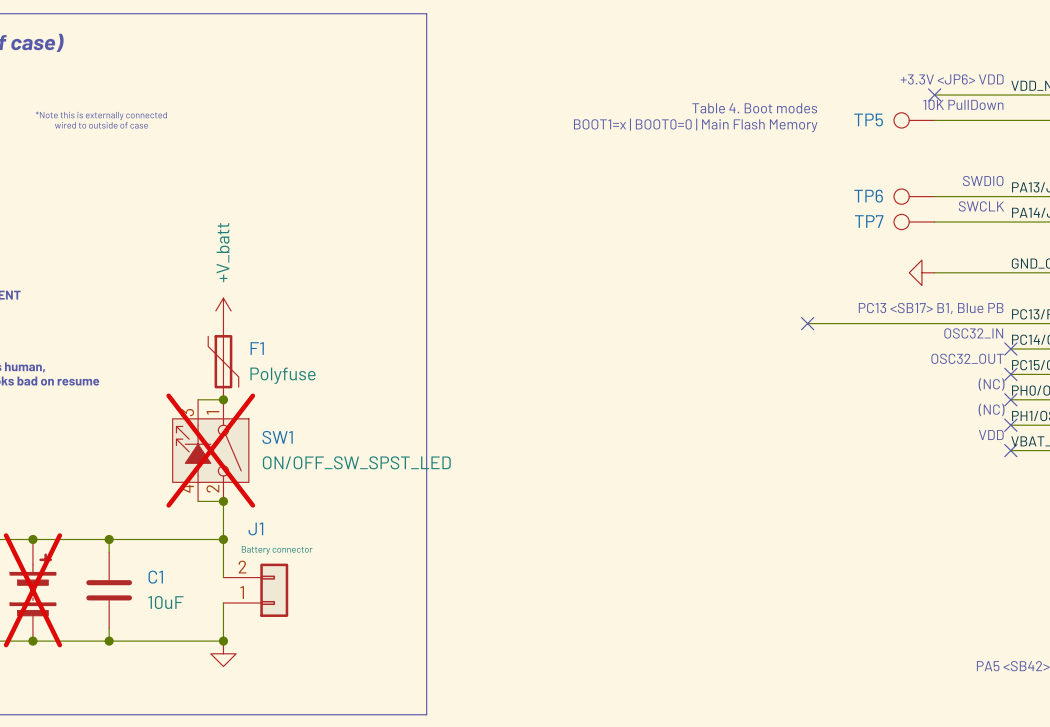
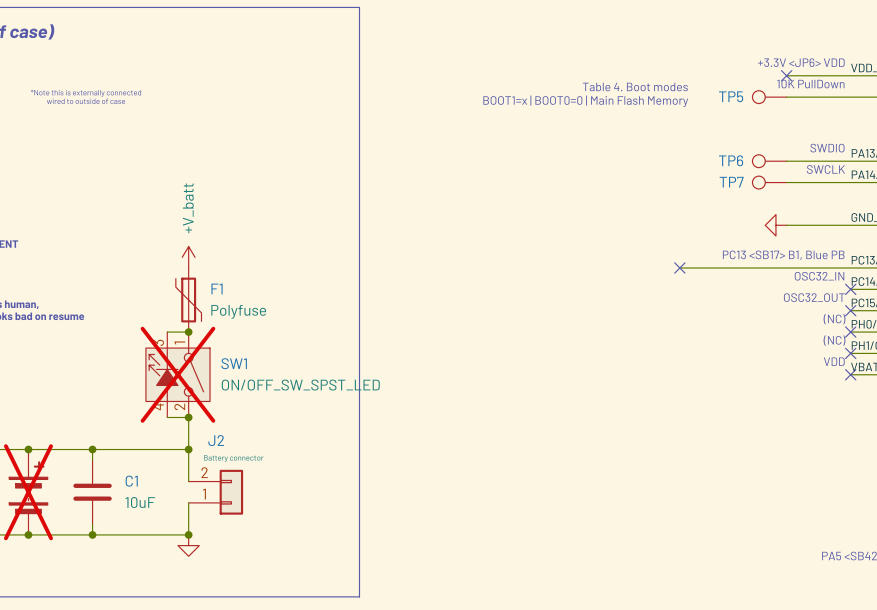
J1 name: J1 (255, 528) -> J2 (216, 440)

